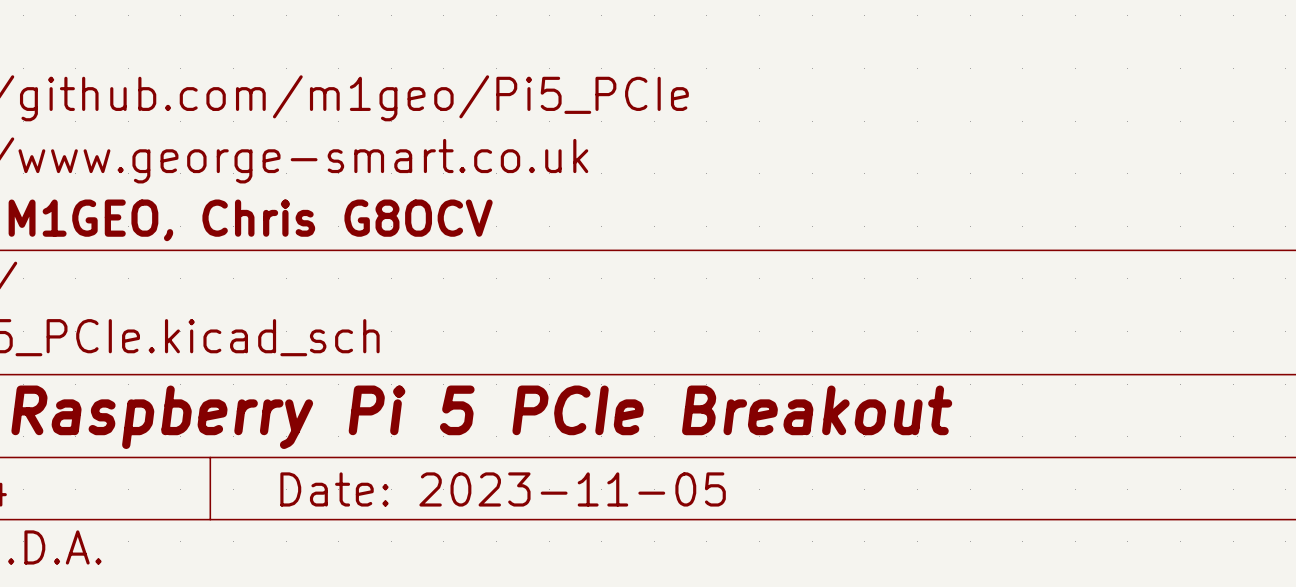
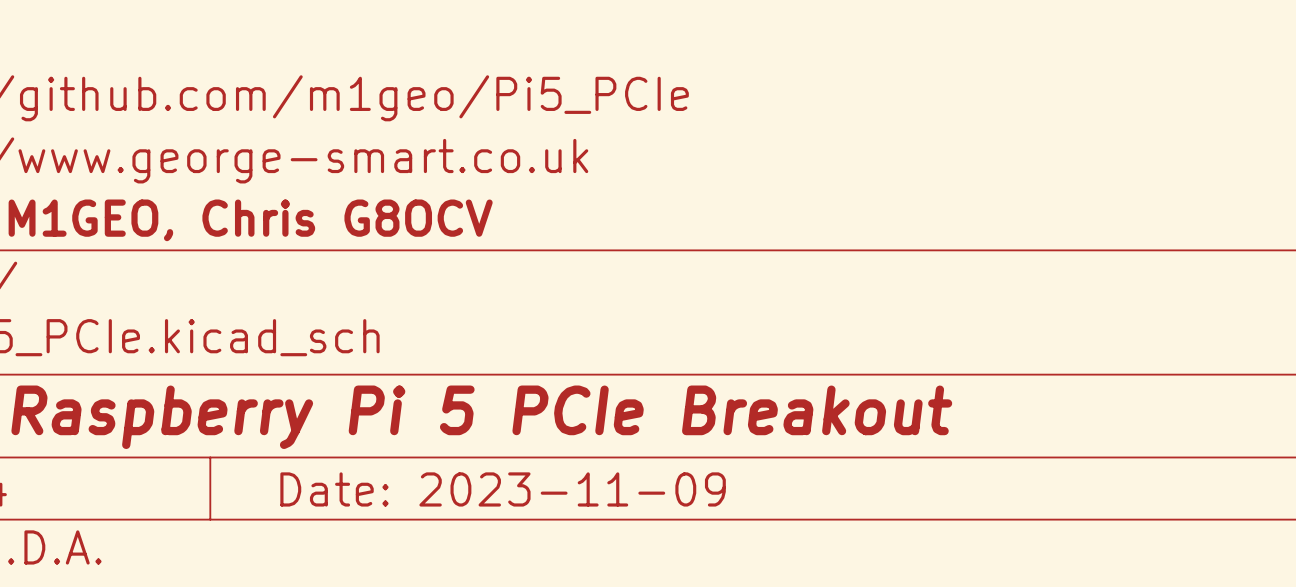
title block: Date: 2023-11-05 (503, 489) -> Date: 2023-11-09 (503, 489)

